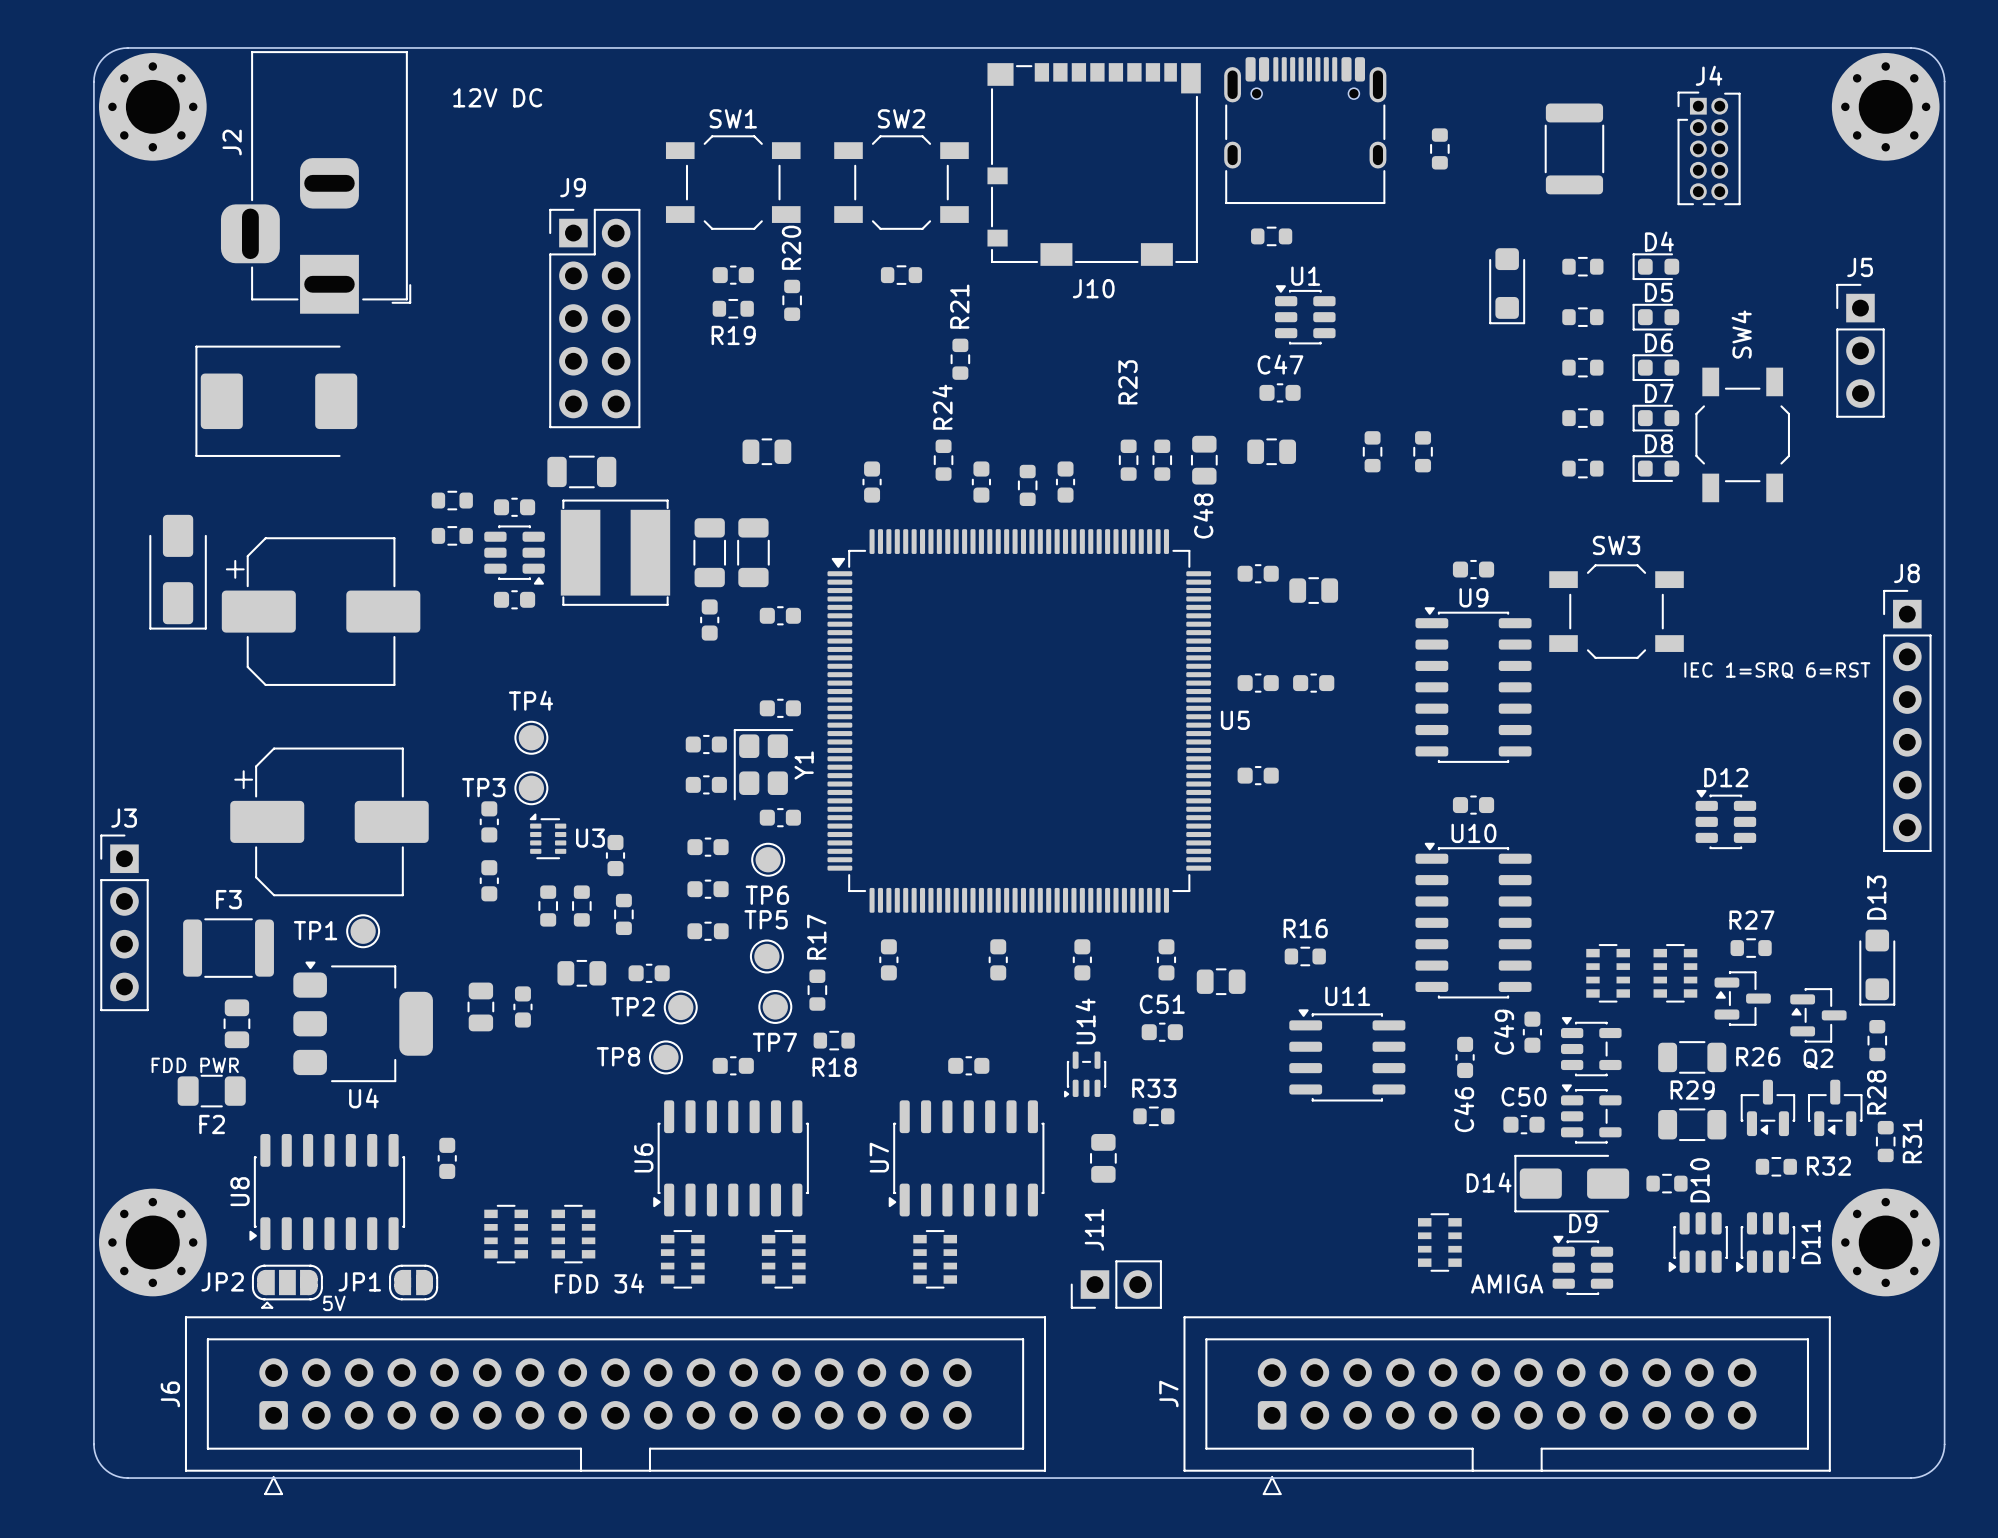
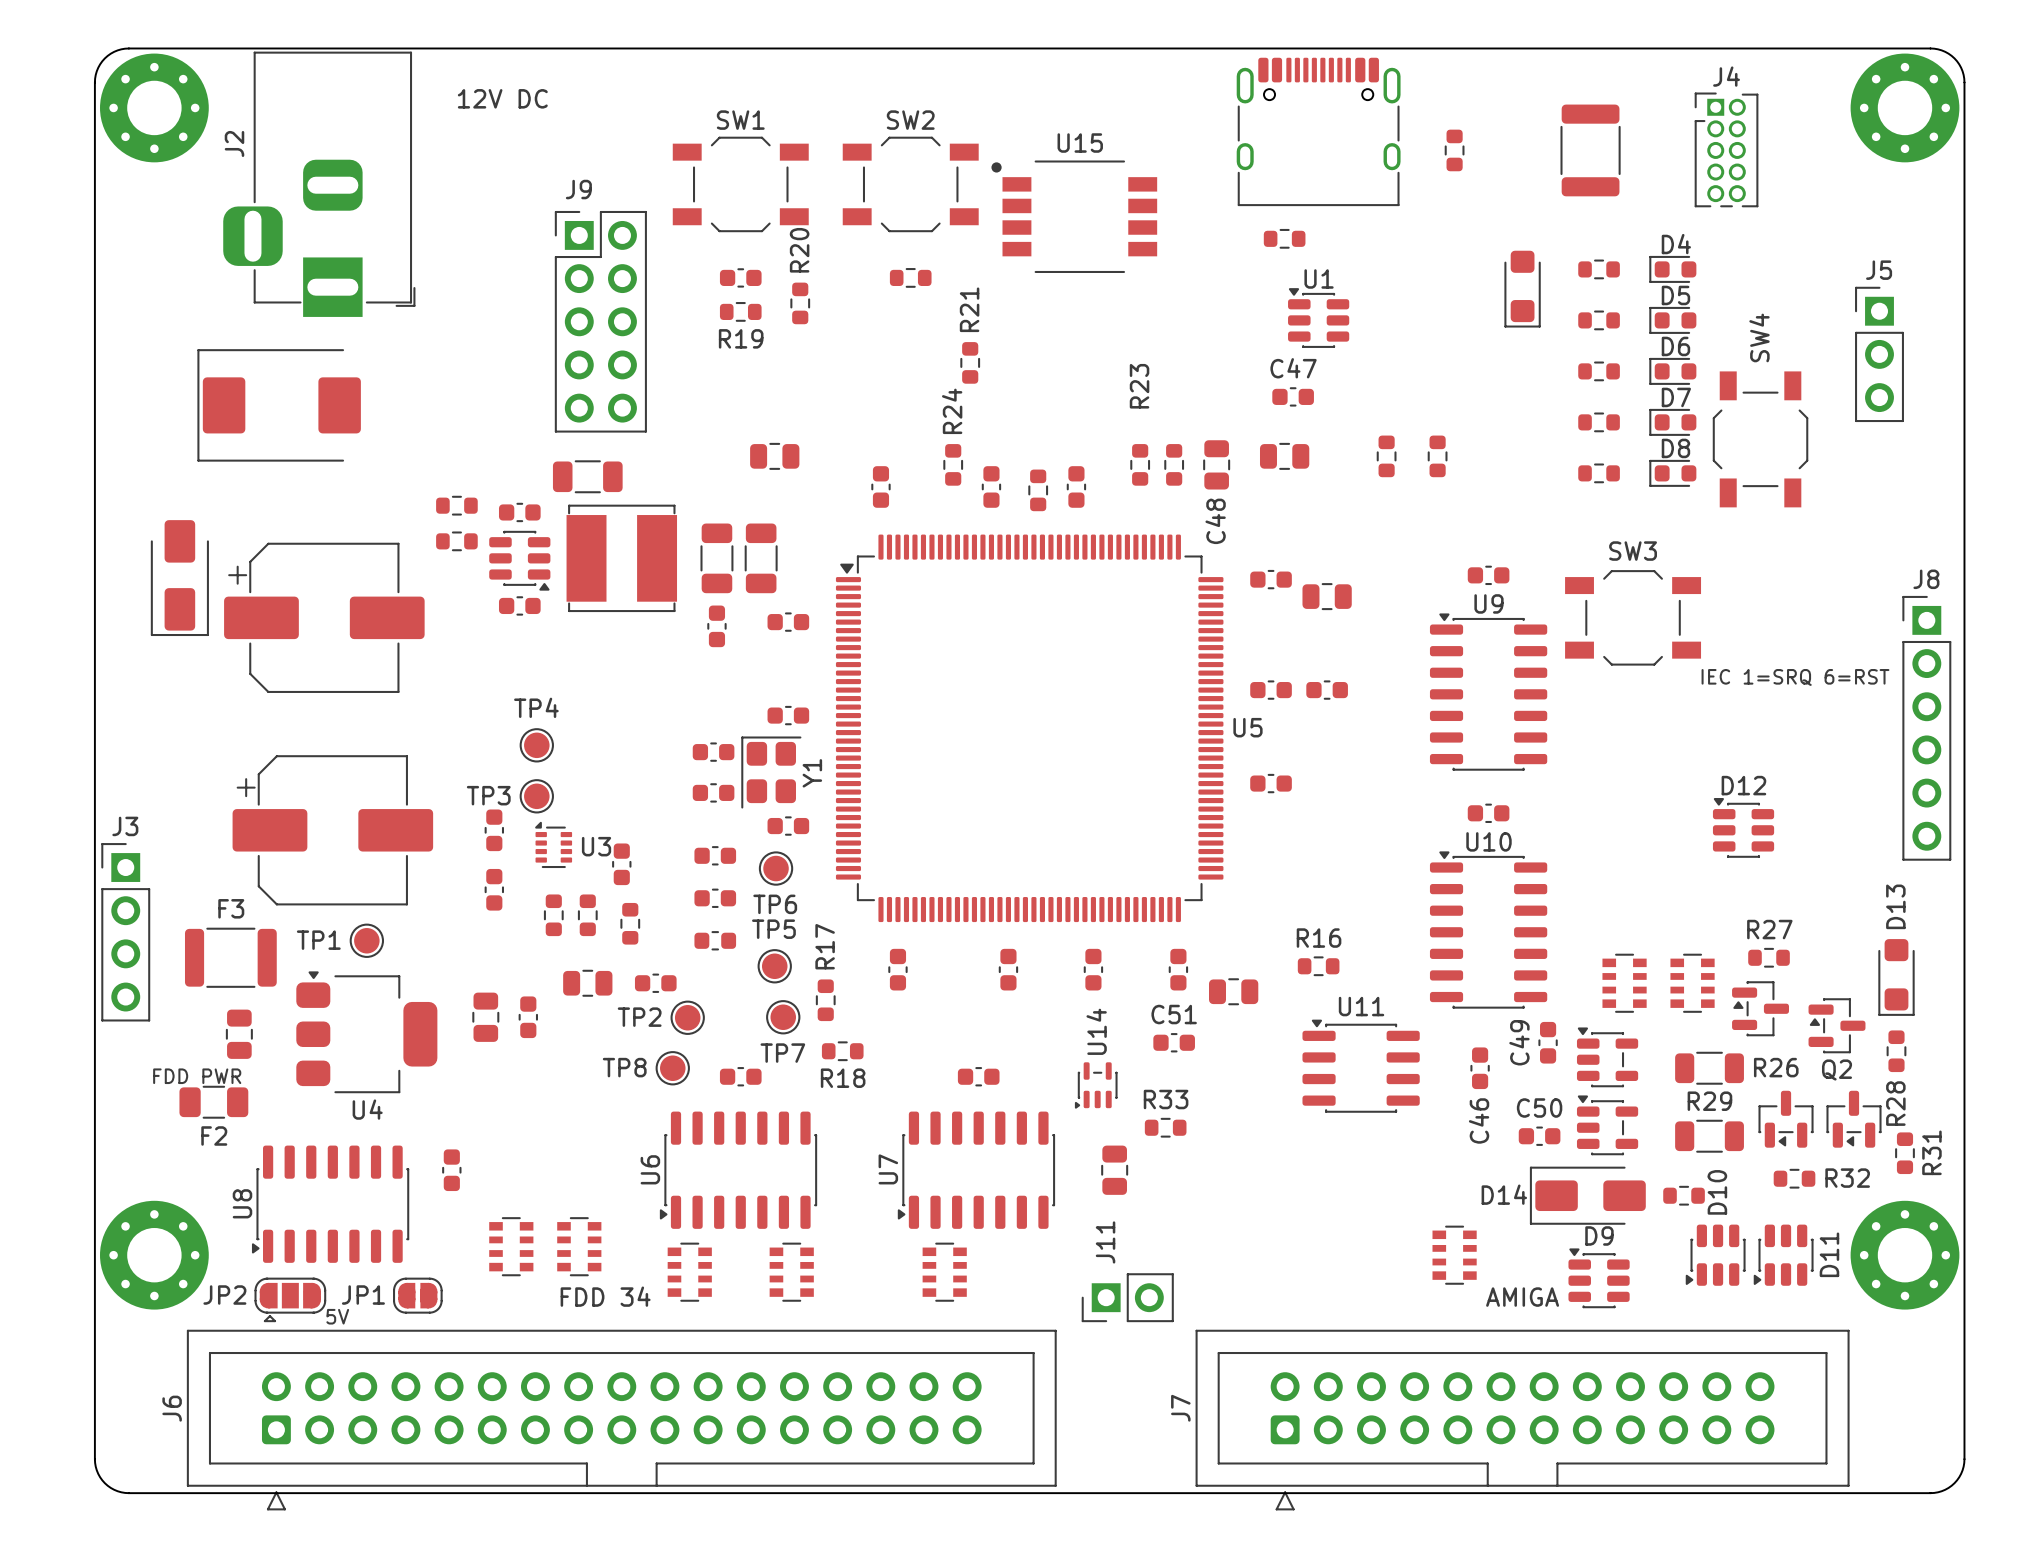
J10: (1094, 164) -> none
U15: none -> (1074, 216)

